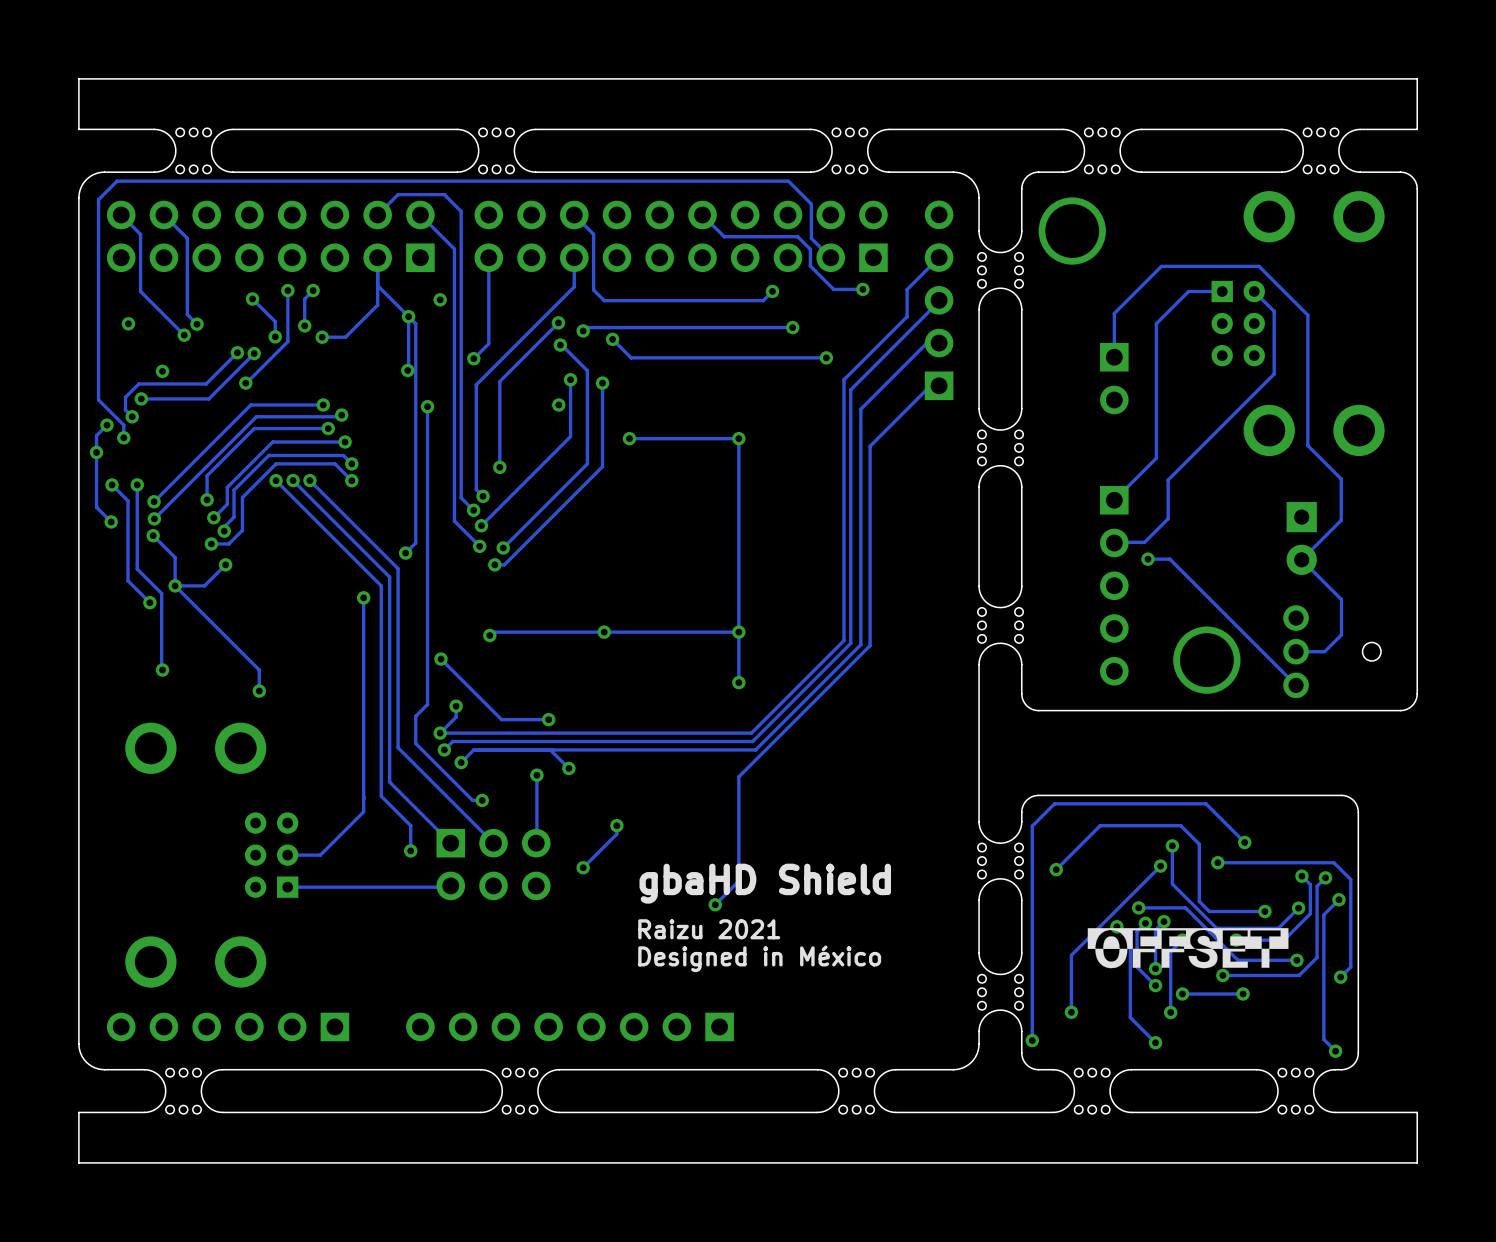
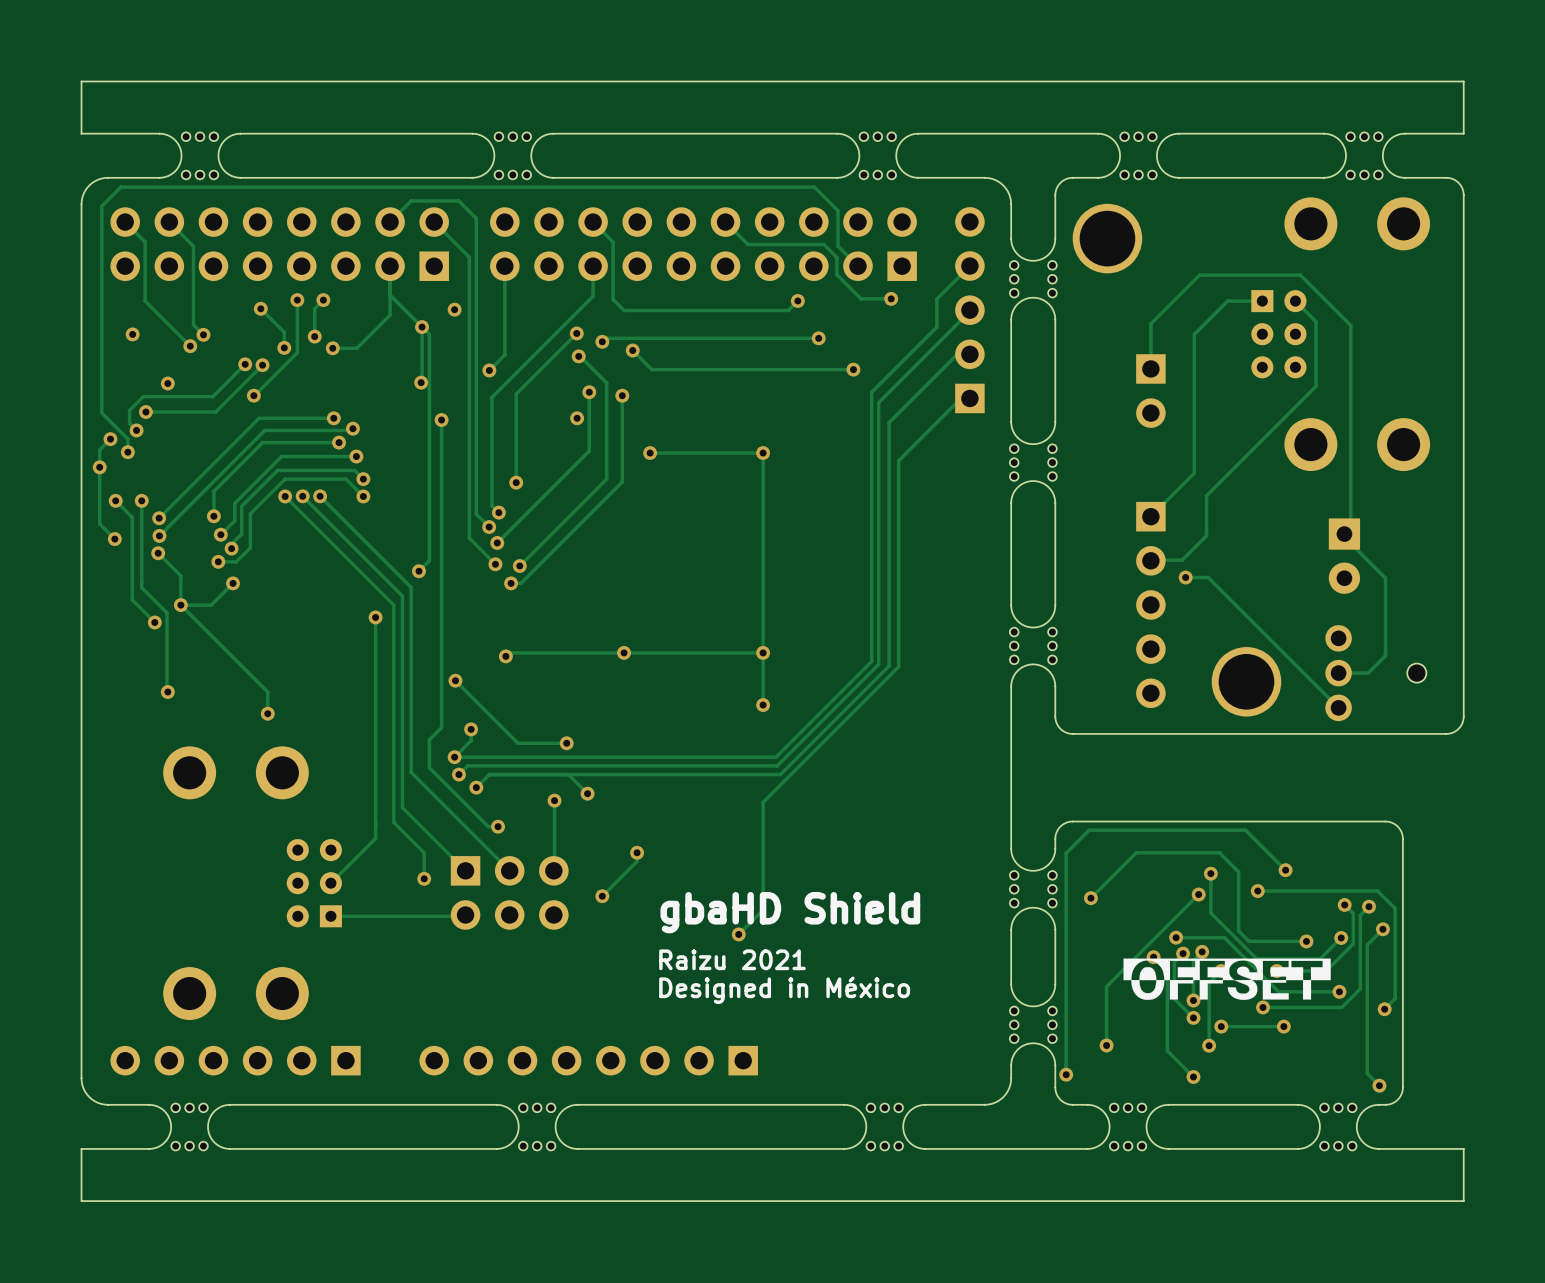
track: (1307, 445) (1341, 479) (1341, 520) (1301, 559) (1341, 599) -> (1350, 460) (1350, 543) (1385, 578) (1385, 619)
part position: (211, 855) -> (252, 883)
track: (320, 855) (287, 855) -> none
track: (320, 887) (287, 887) -> none

